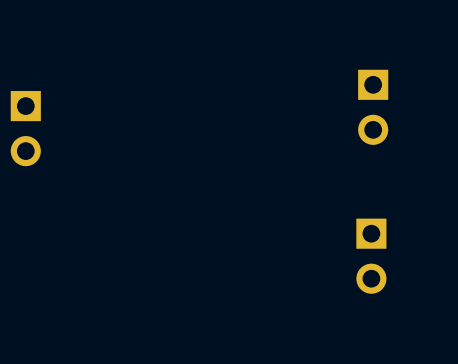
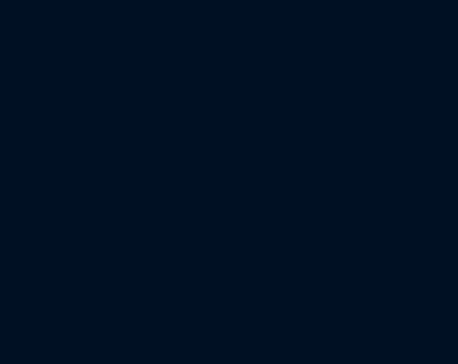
part: (373, 107) -> none
part: (25, 128) -> none
part: (371, 256) -> none

